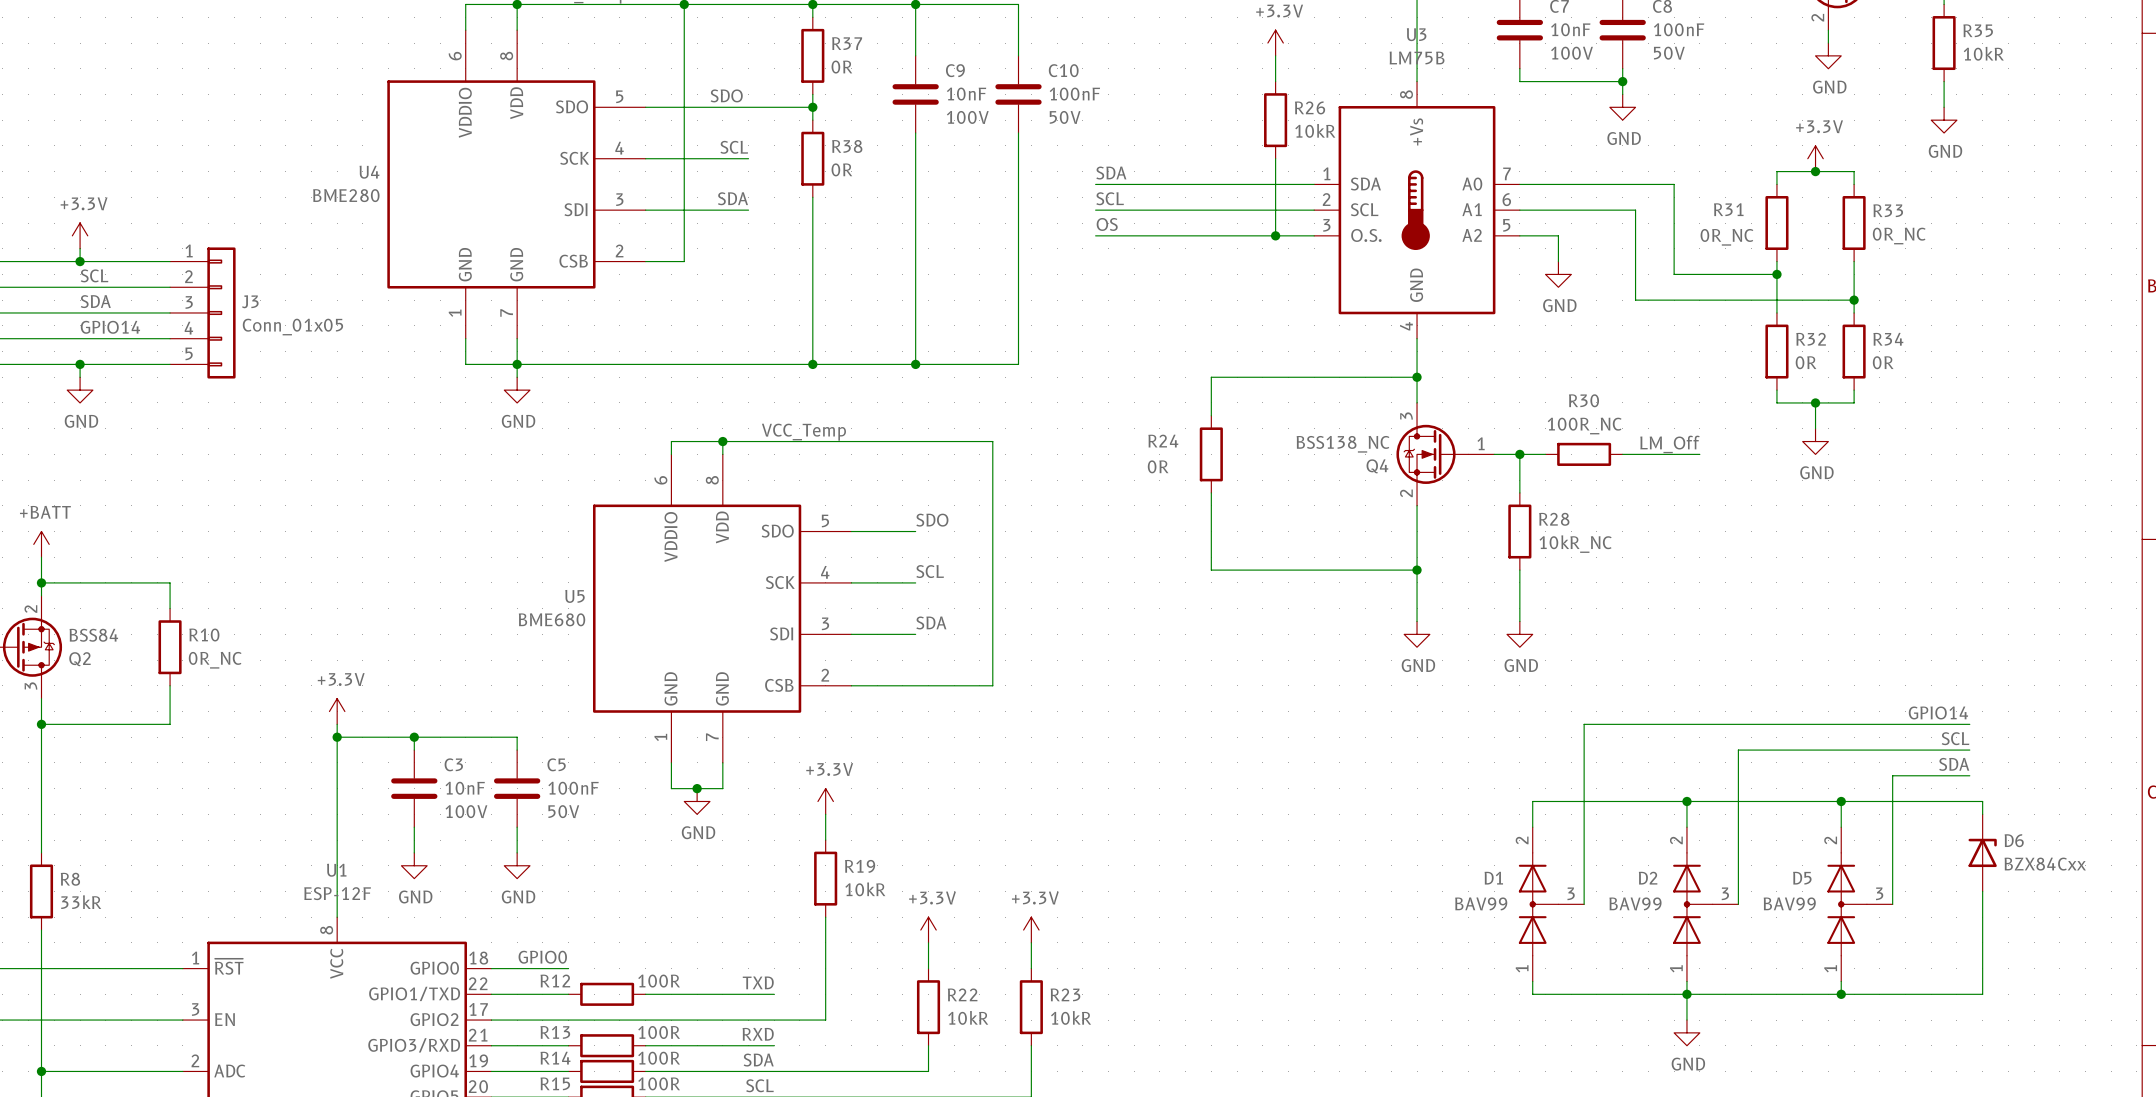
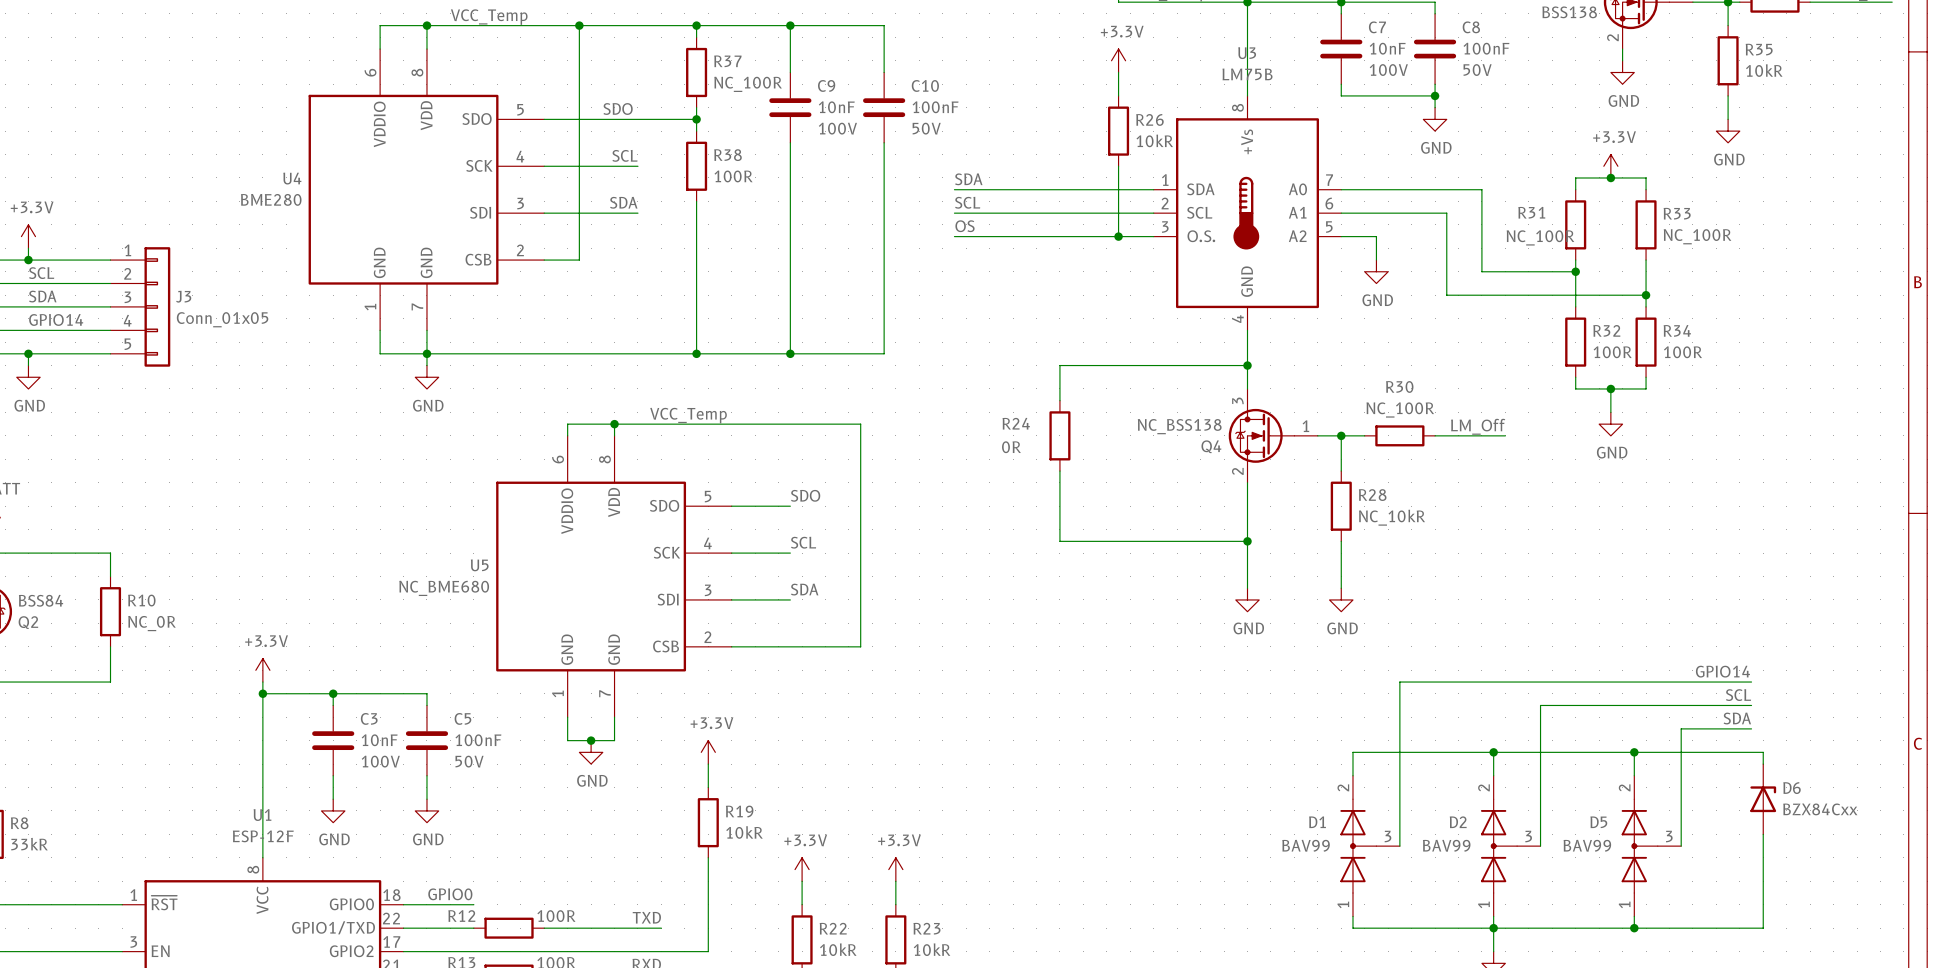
R37 value: 0R (841, 67) -> NC_100R (748, 84)
R38 value: 0R (841, 169) -> 100R (733, 176)
R33 value: 0R_NC (1899, 236) -> NC_100R (1697, 236)
R31 value: 0R_NC (1726, 237) -> NC_100R (1540, 237)
R32 value: 0R (1806, 362) -> 100R (1612, 352)
R34 value: 0R (1883, 362) -> 100R (1682, 352)
R30 value: 100R_NC (1584, 426) -> NC_100R (1400, 409)
Q4 value: BSS138_NC (1343, 444) -> NC_BSS138 (1179, 426)
R28 value: 10kR_NC (1575, 544) -> NC_10kR (1392, 517)
U5 value: BME680 (552, 619) -> NC_BME680 (444, 588)
R10 value: 0R_NC (215, 660) -> NC_0R (151, 623)

